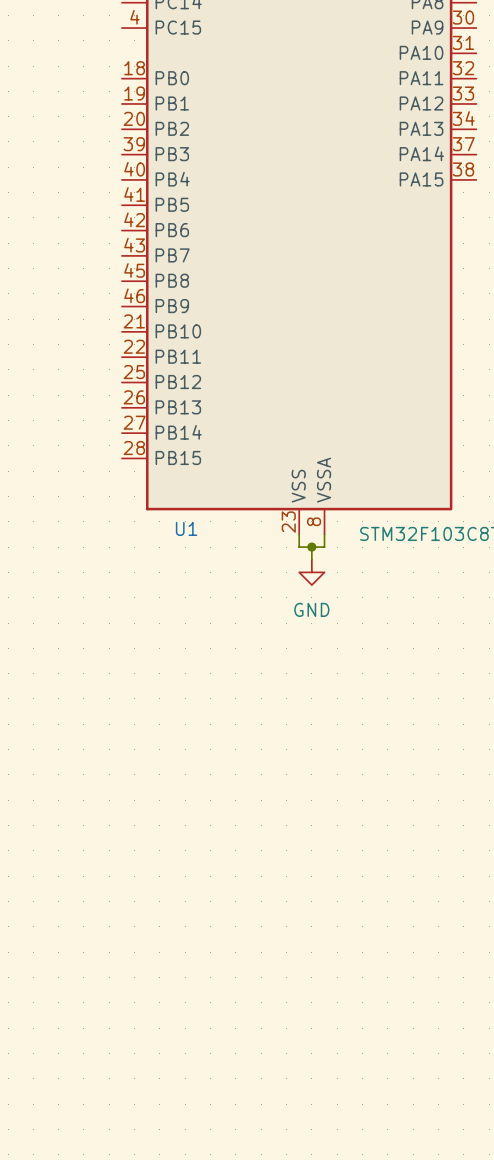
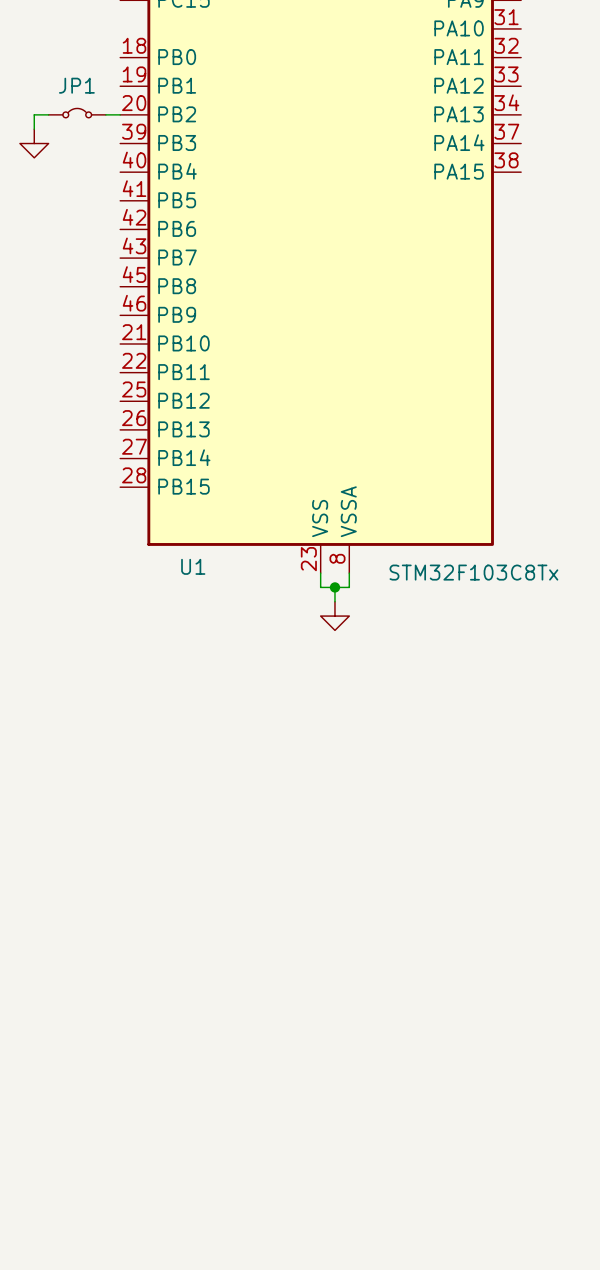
JP1: none -> (77, 113)
wire: none -> (48, 114) (34, 114) (34, 129)
wire: none -> (105, 114) (120, 114)
power symbol: none -> (34, 143)
power symbol text: GND (311, 609) -> none

